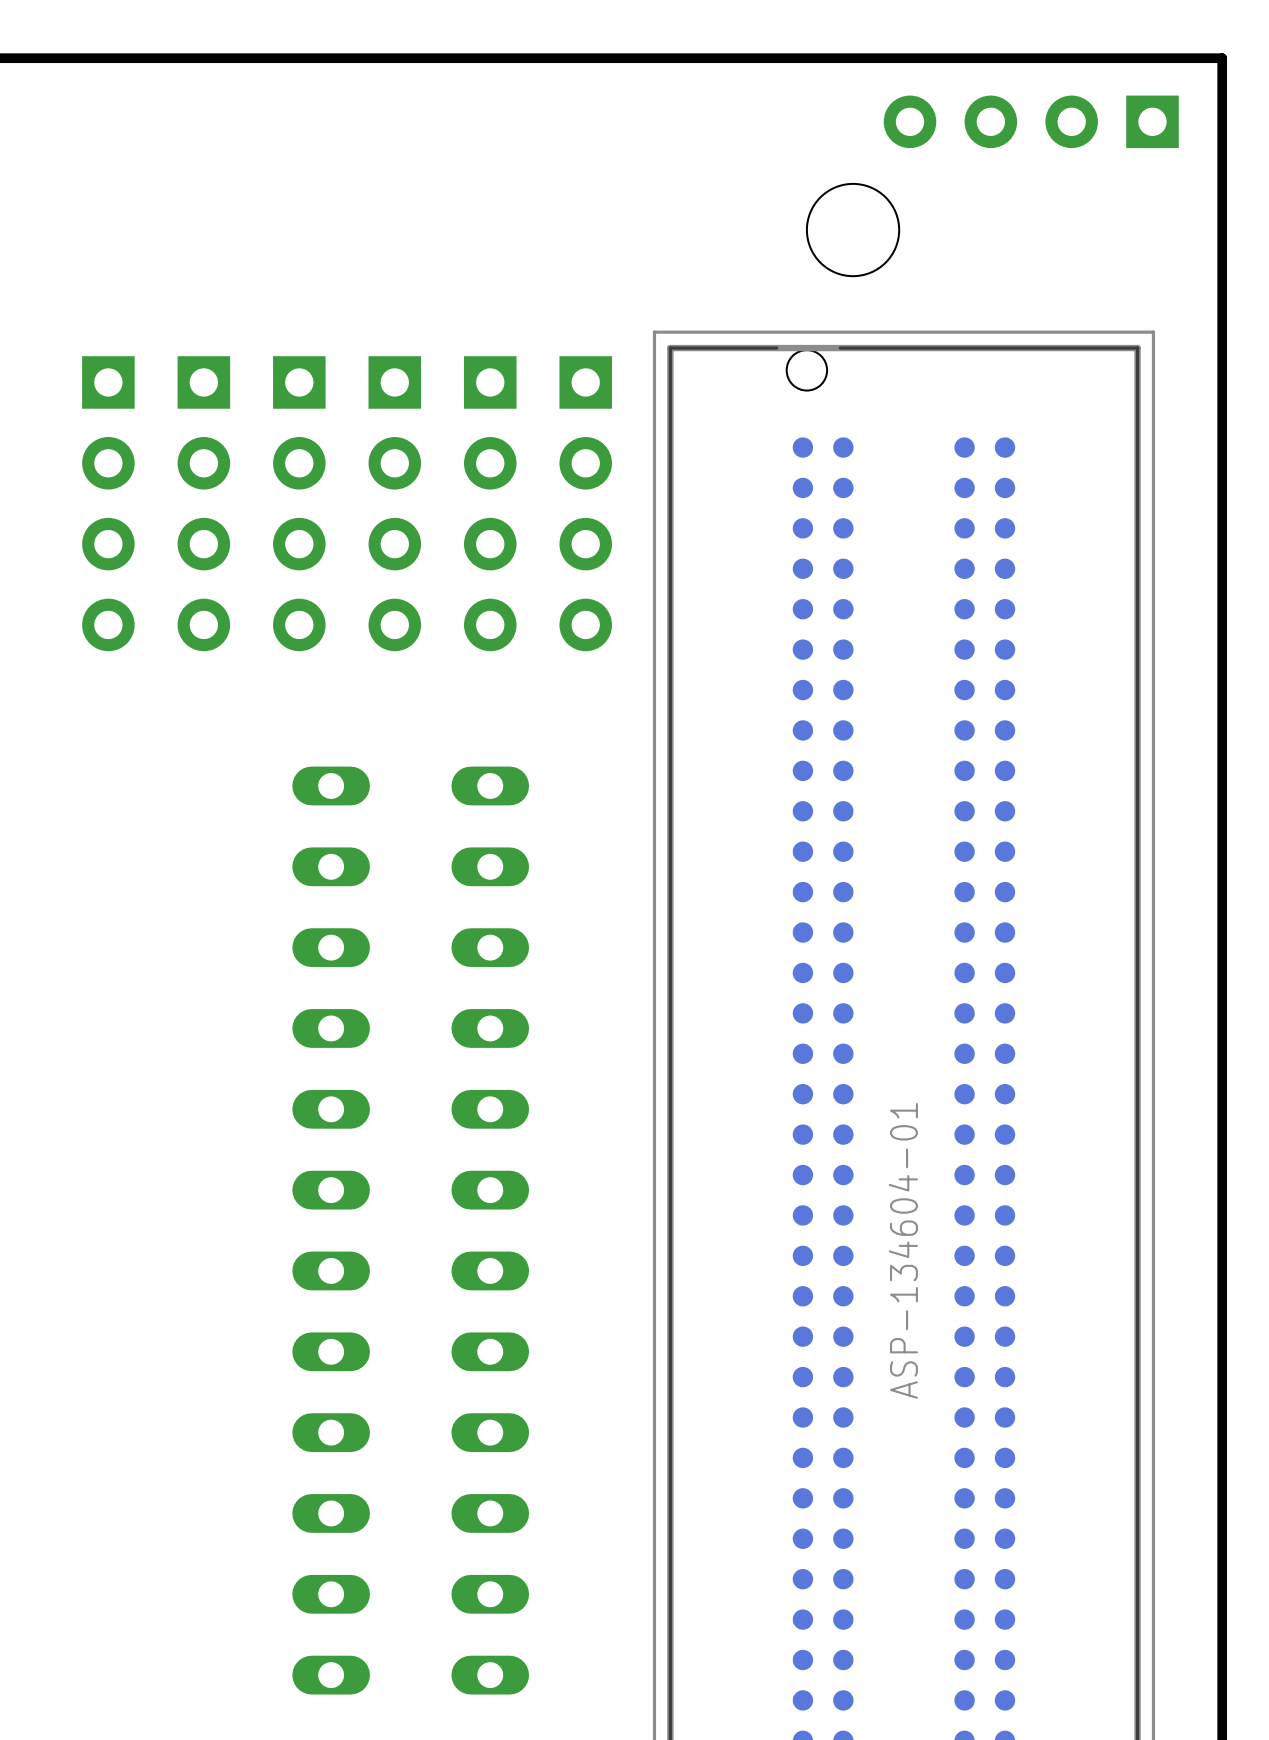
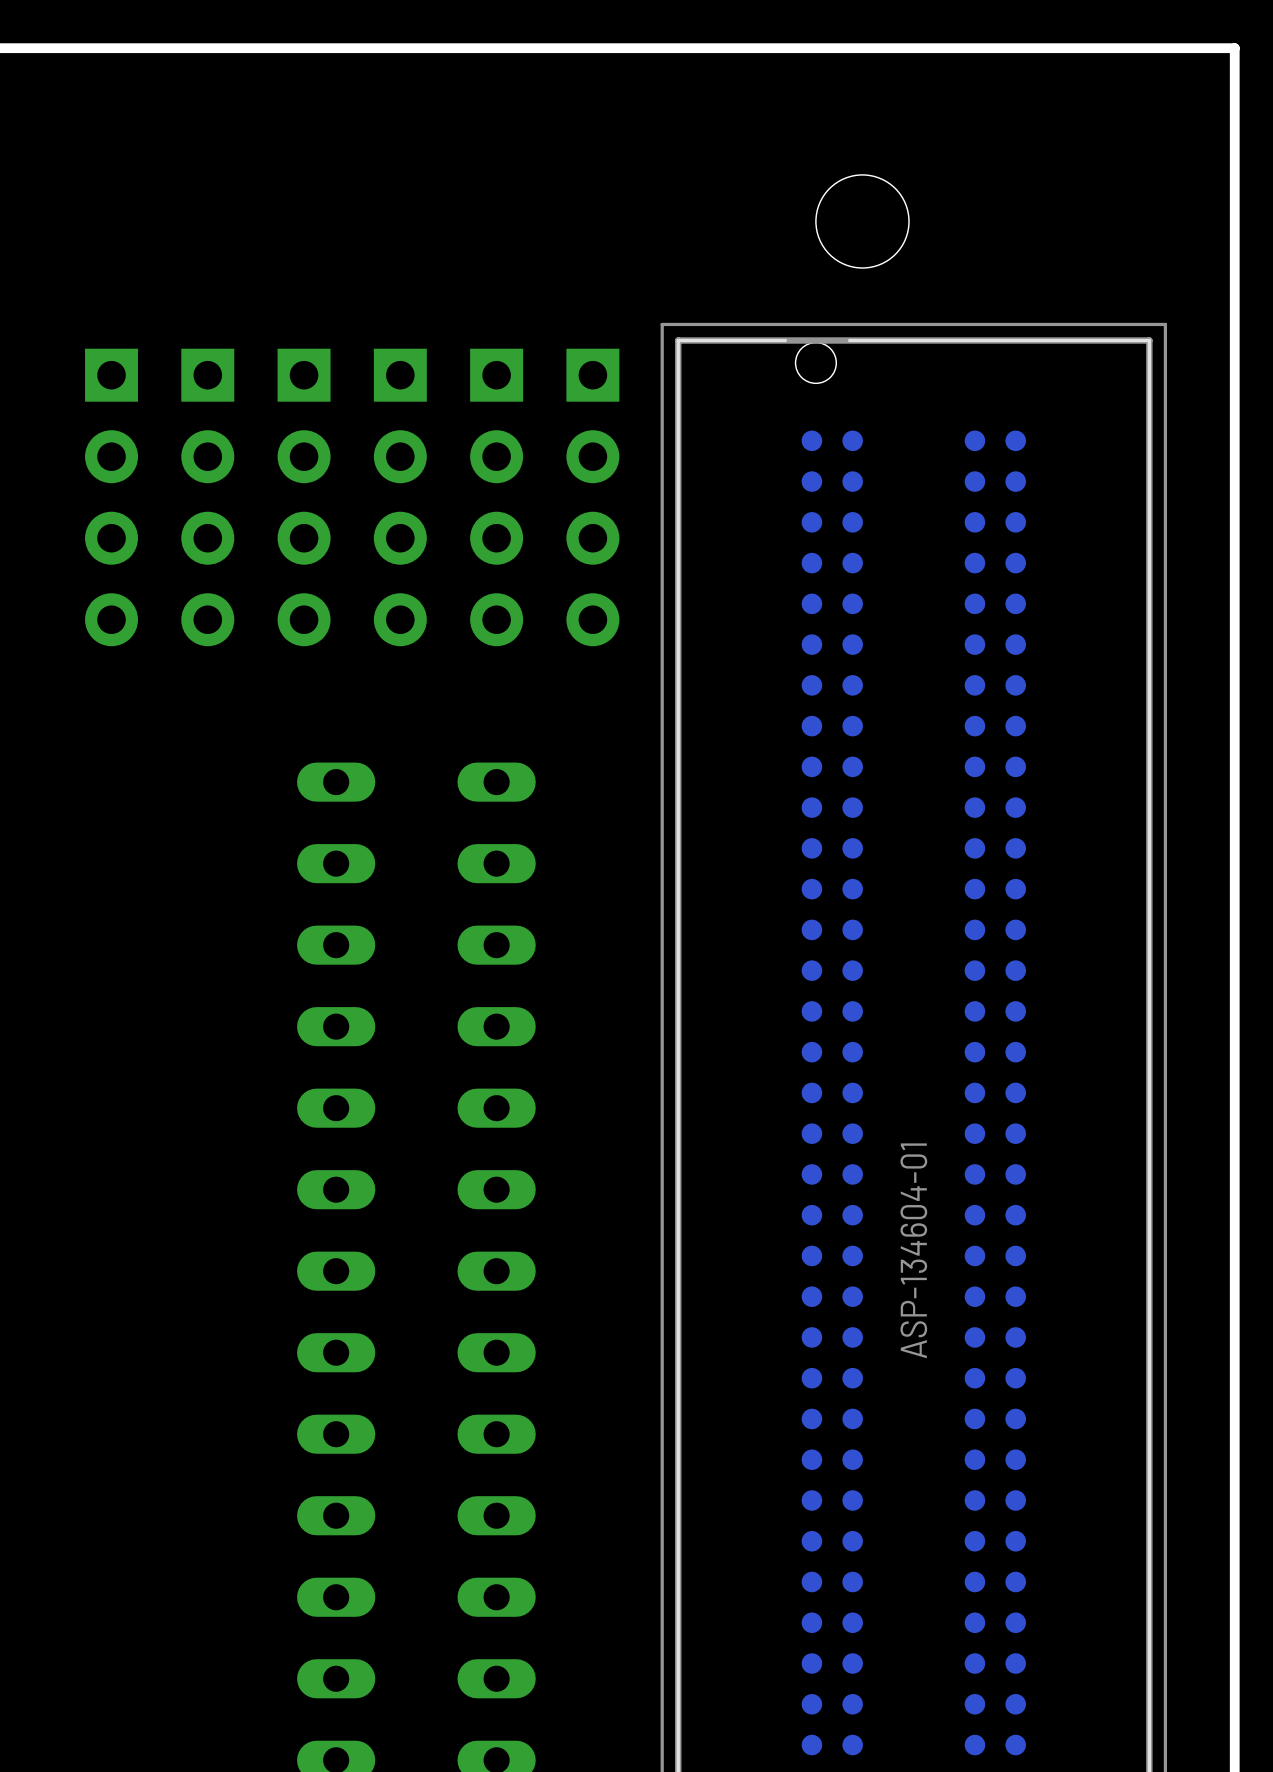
part: (1031, 121) -> none

